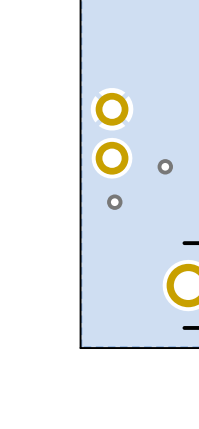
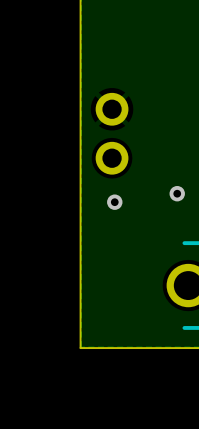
via: (165, 166) -> none
via: none -> (177, 193)

